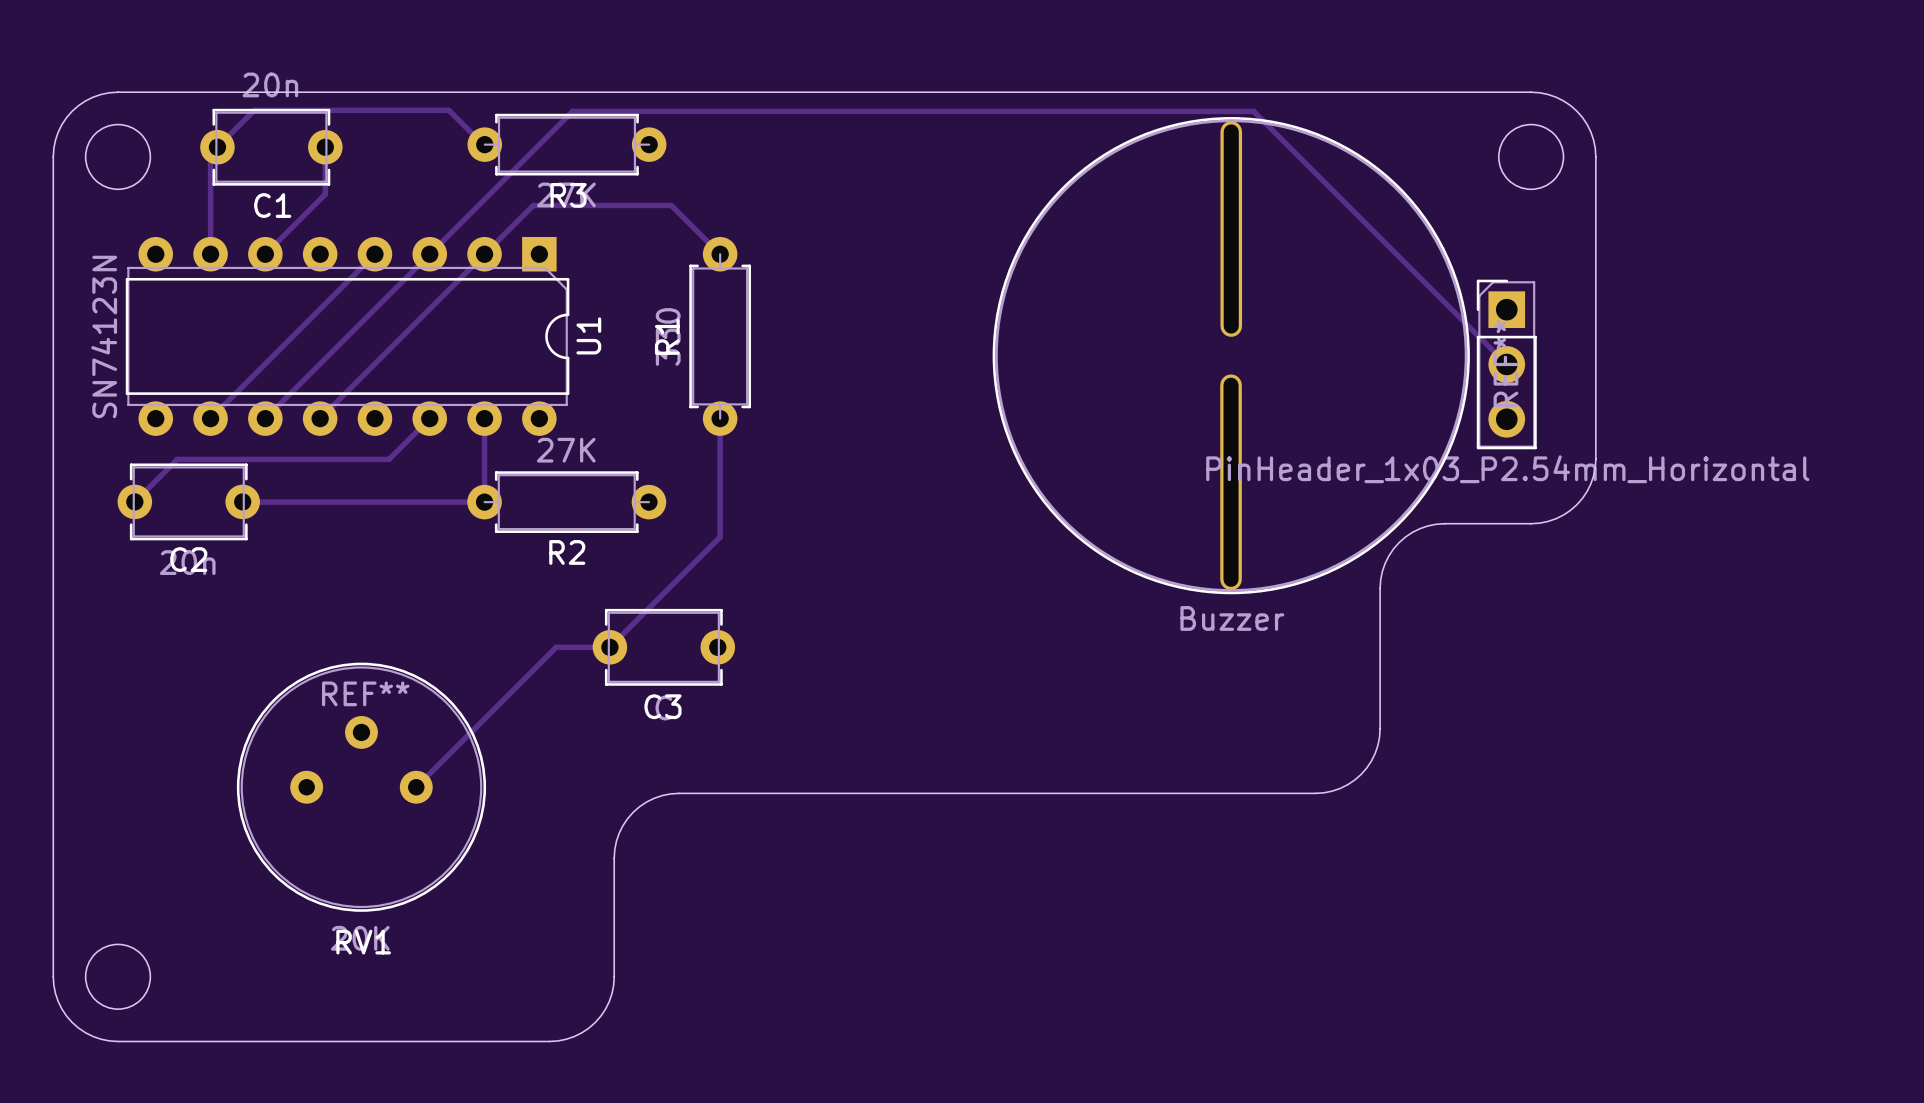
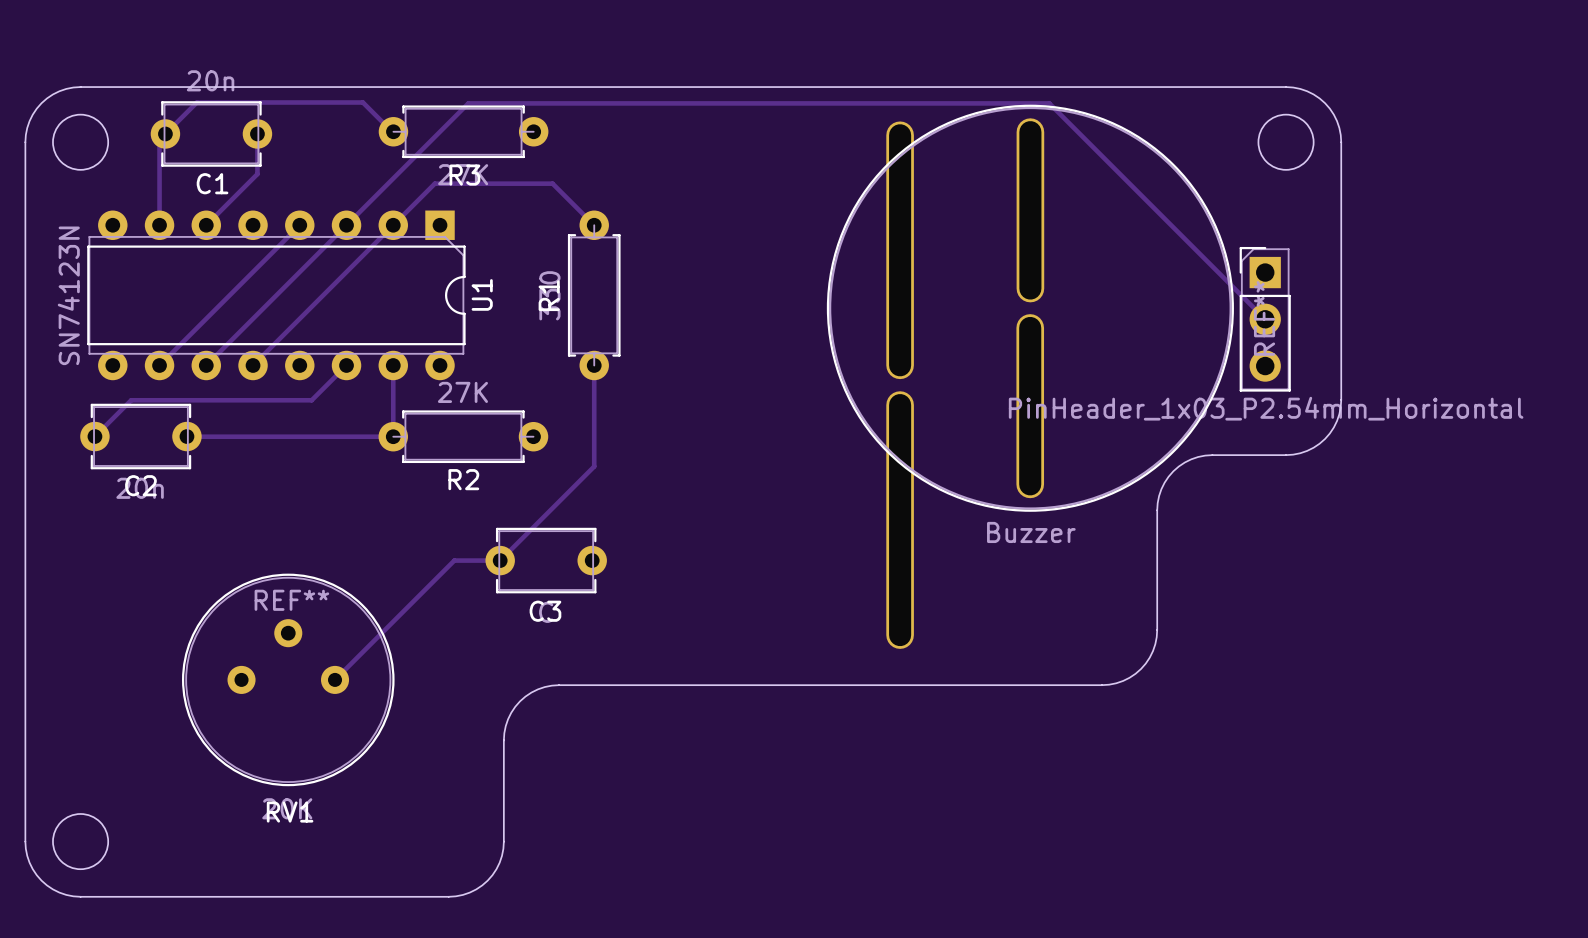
part footprint: [992, 117, 1470, 595] -> [826, 104, 1234, 512]
part: none -> (900, 385)

